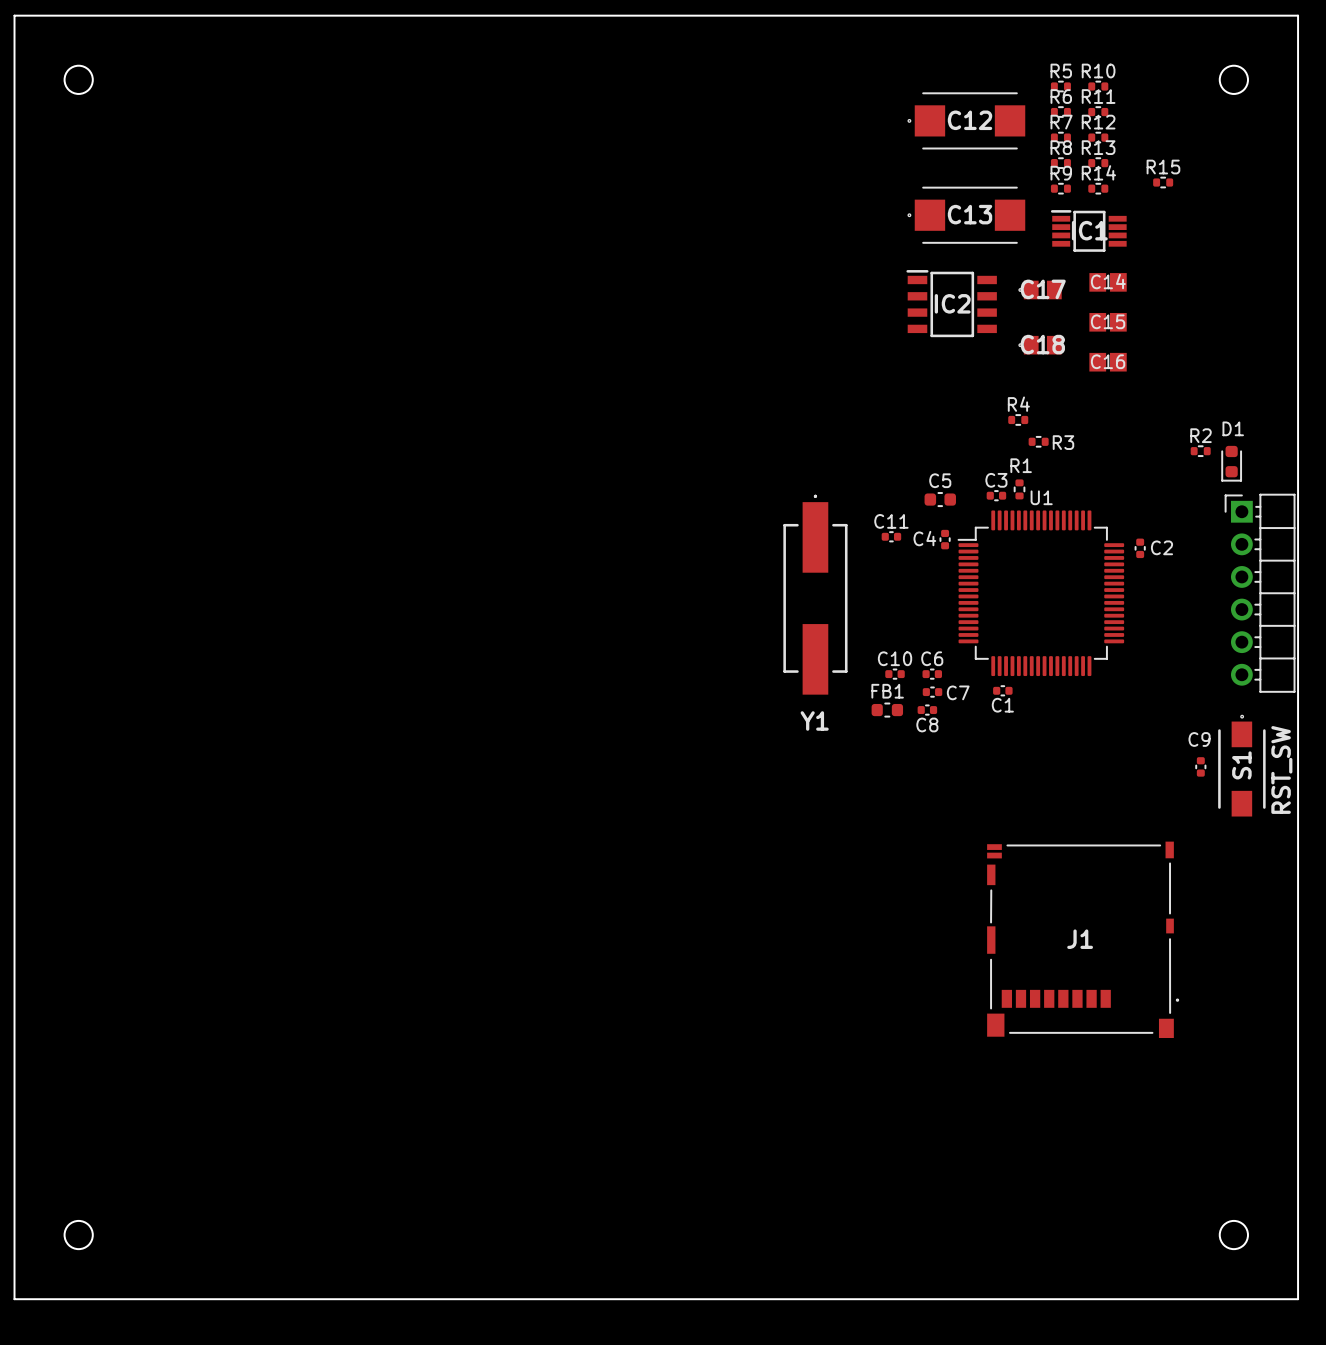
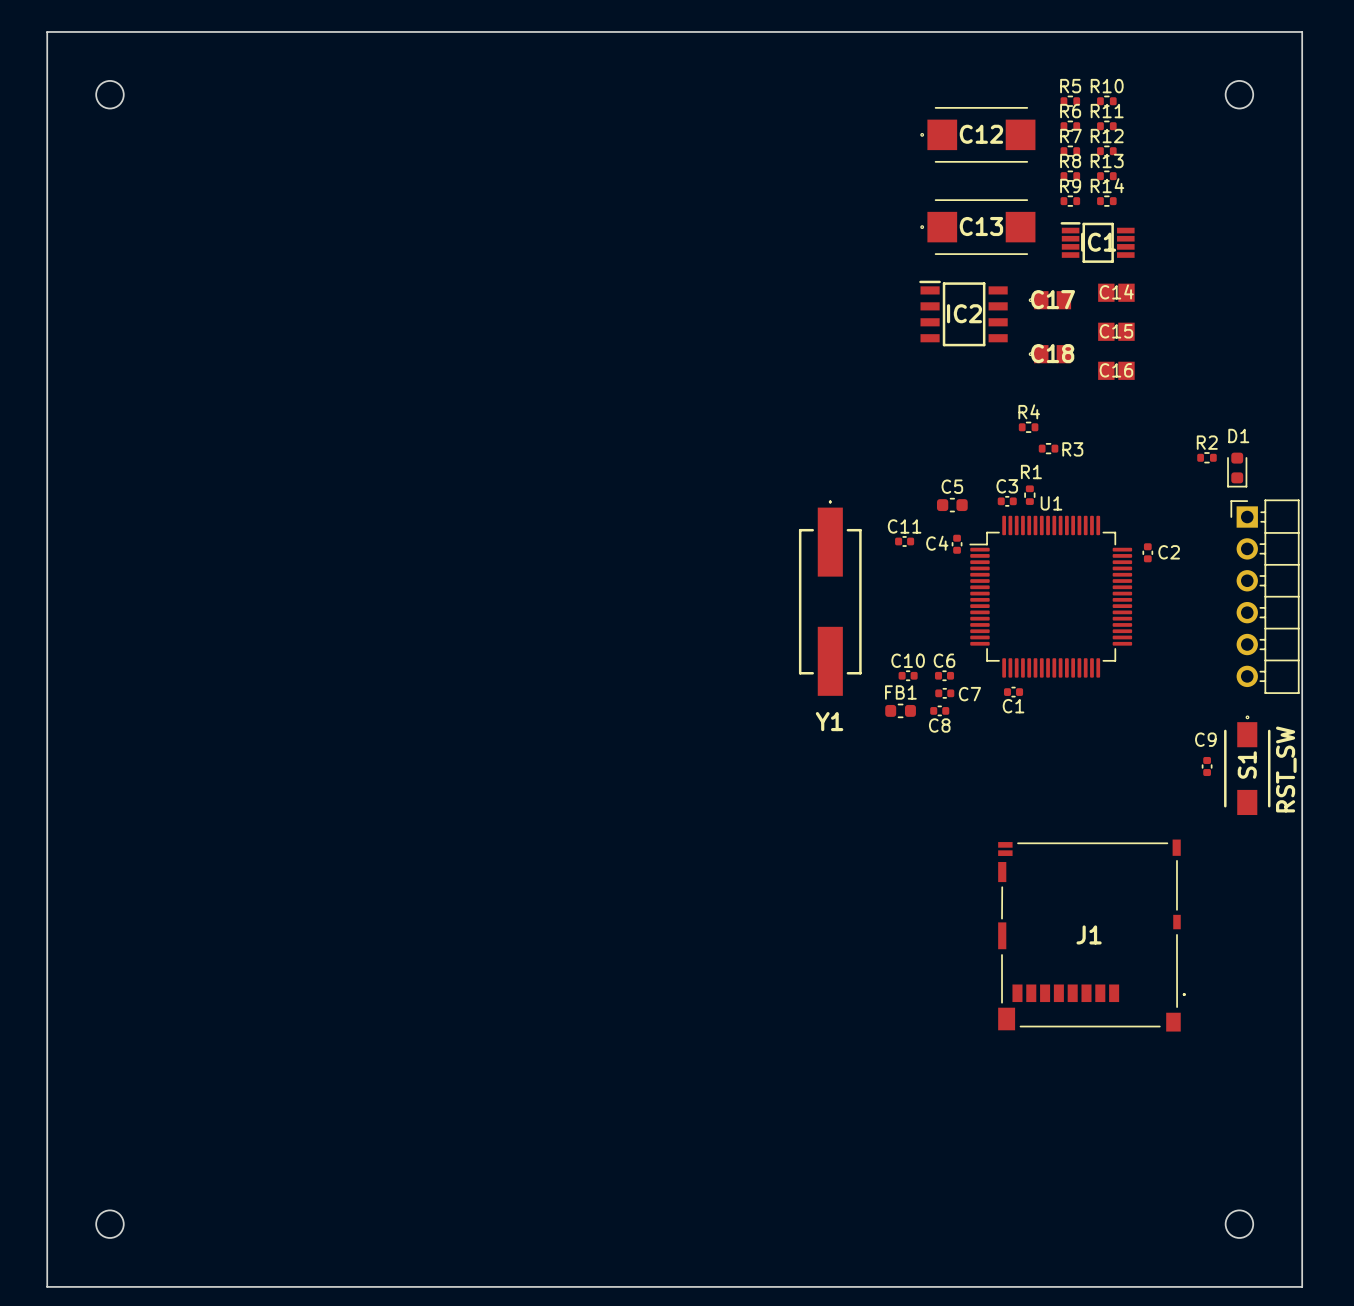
R15: (1163, 182) -> none

